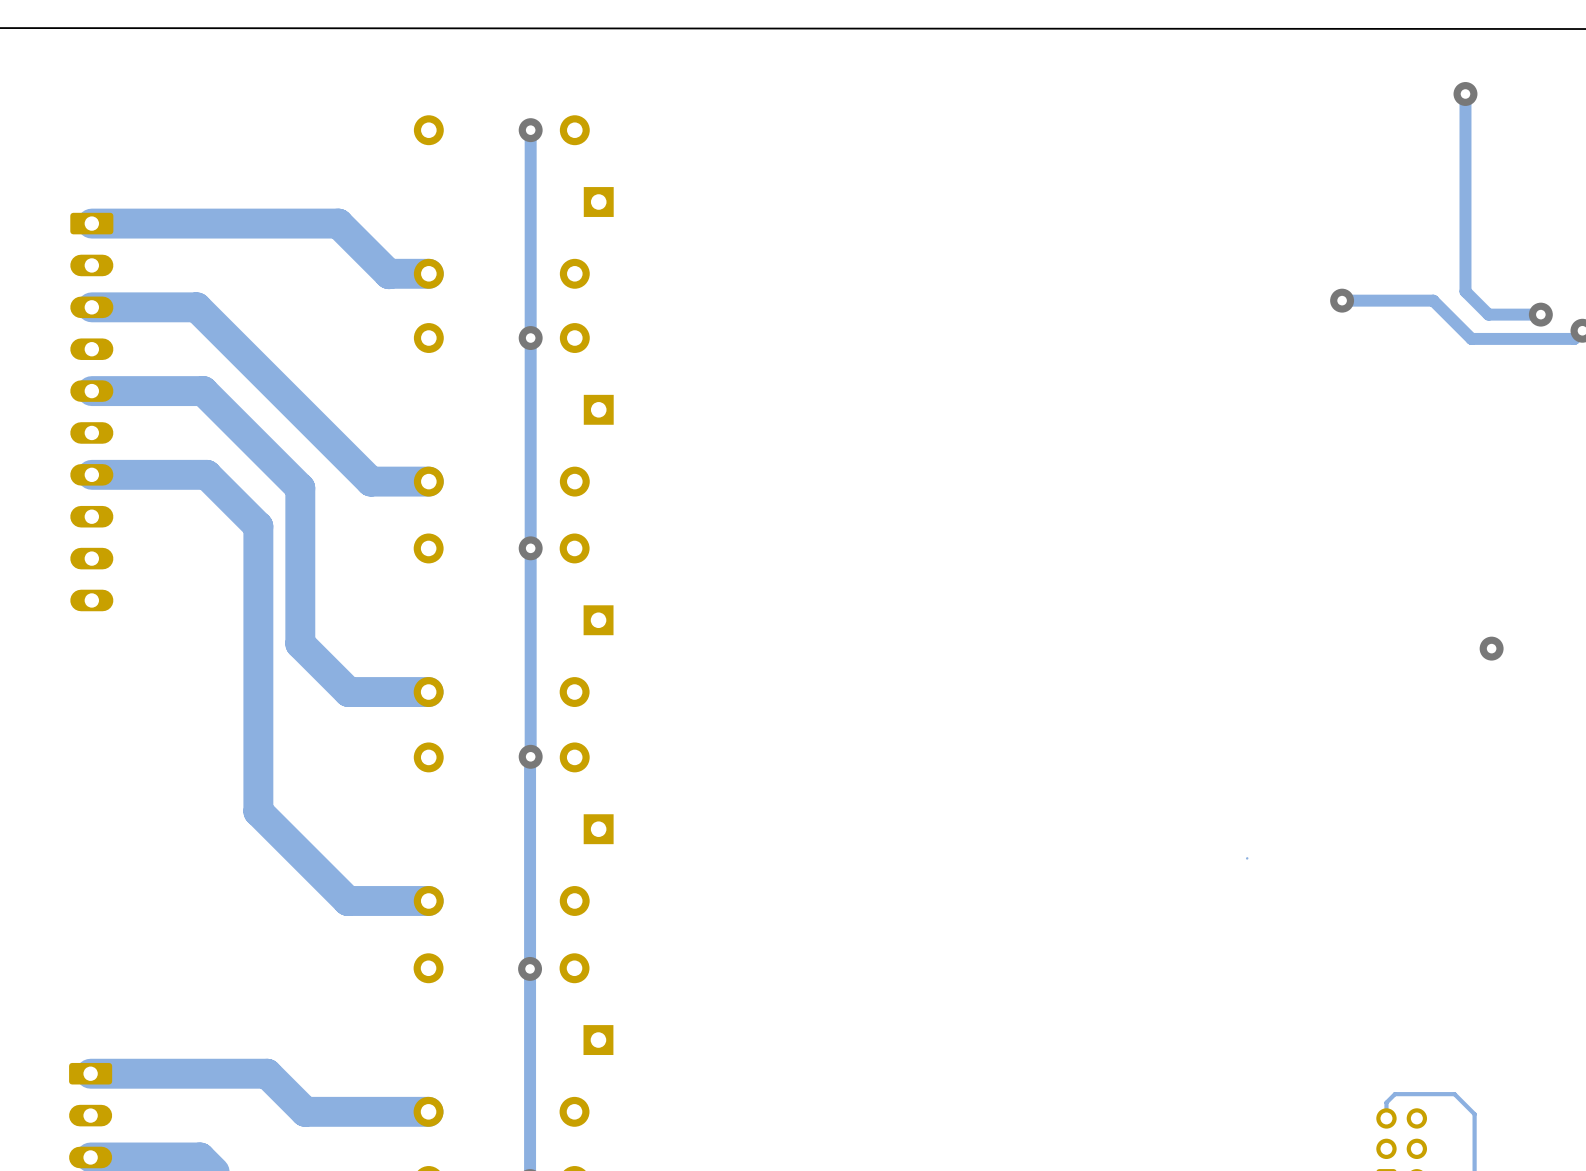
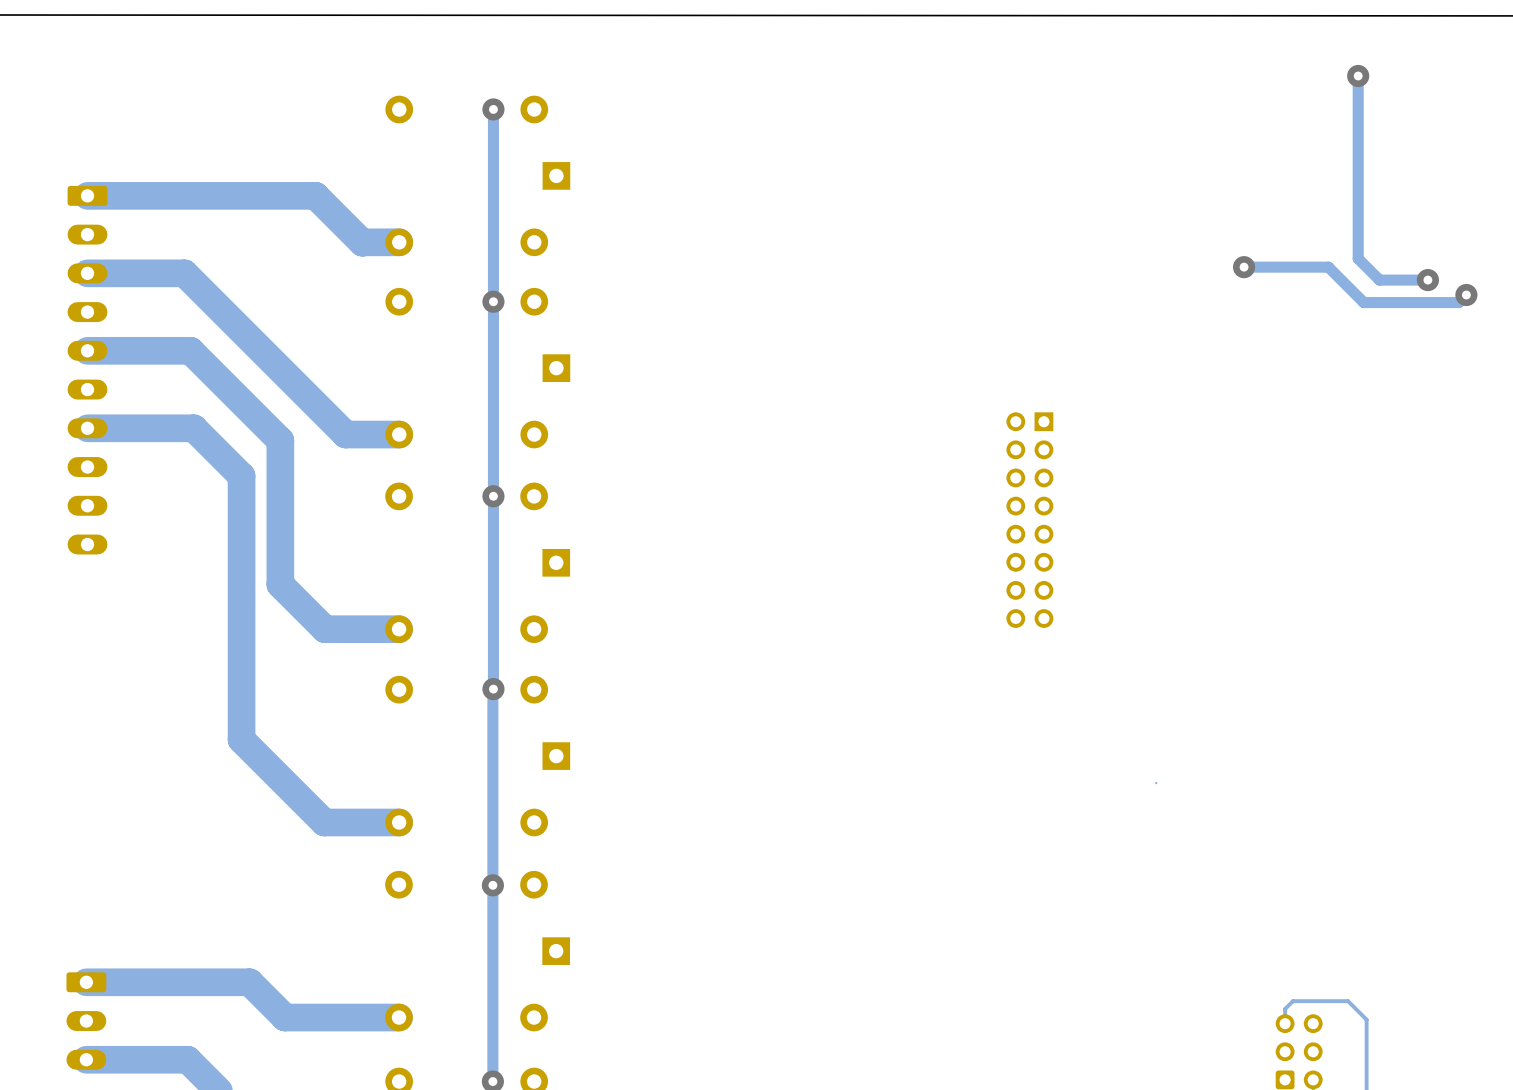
part: none -> (1029, 520)
via: (1491, 648) -> none

